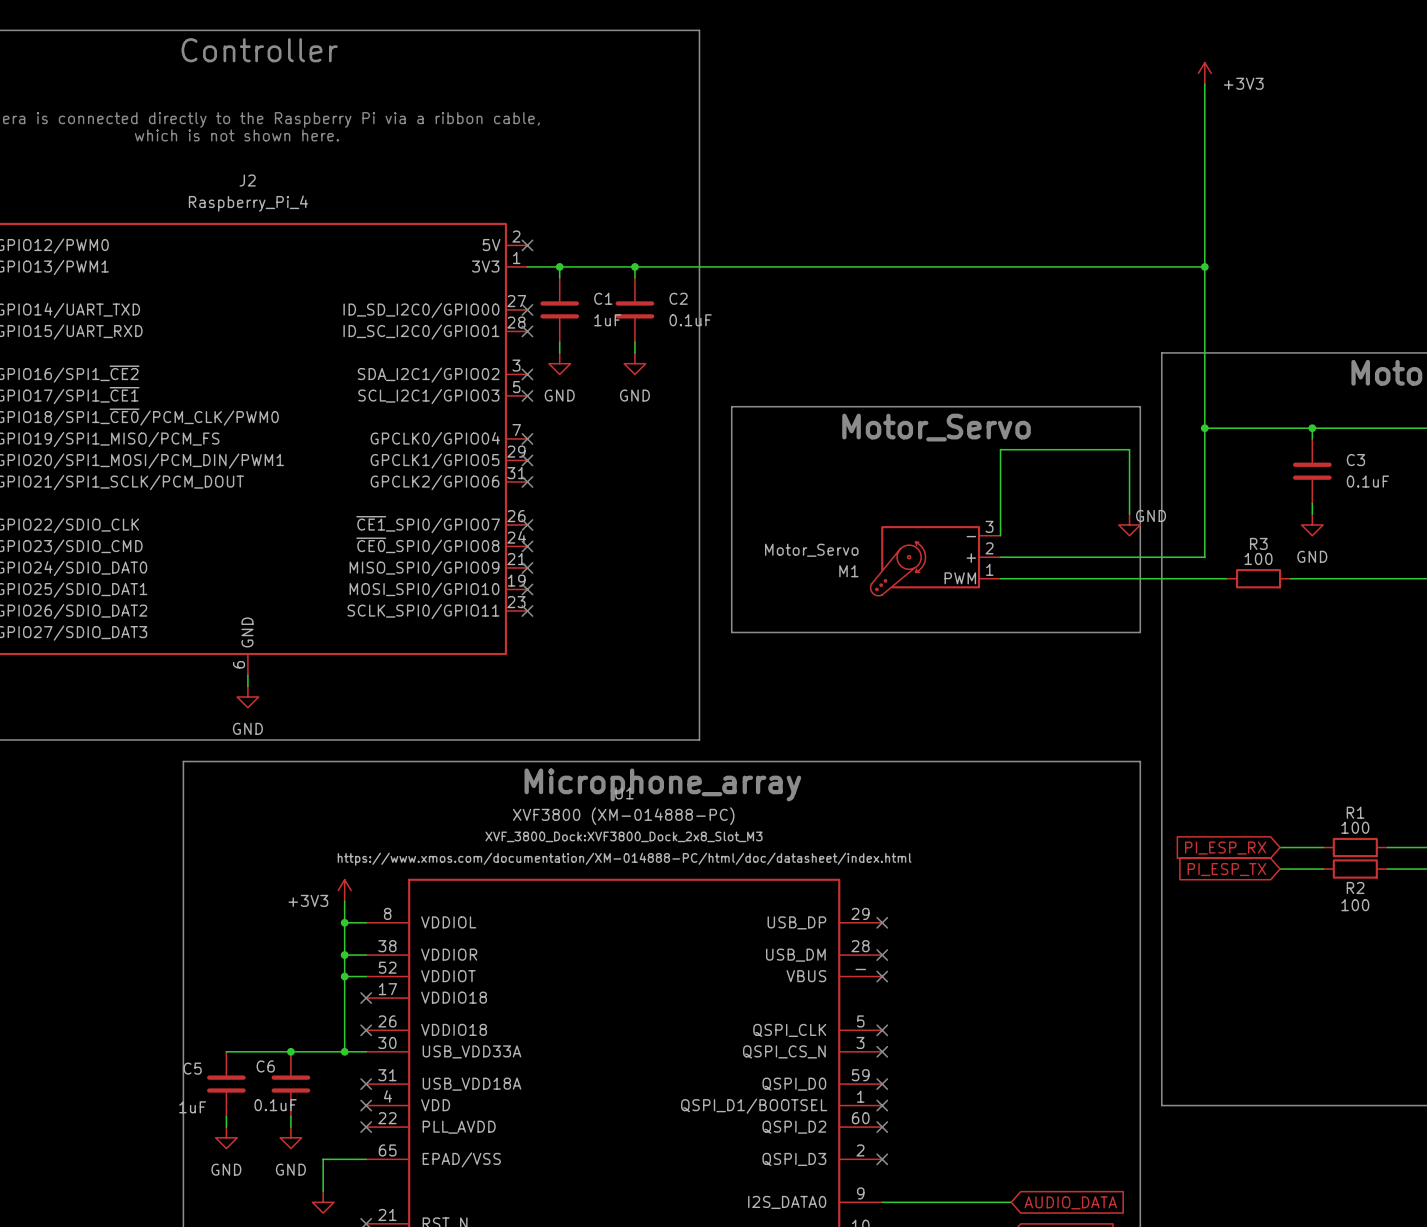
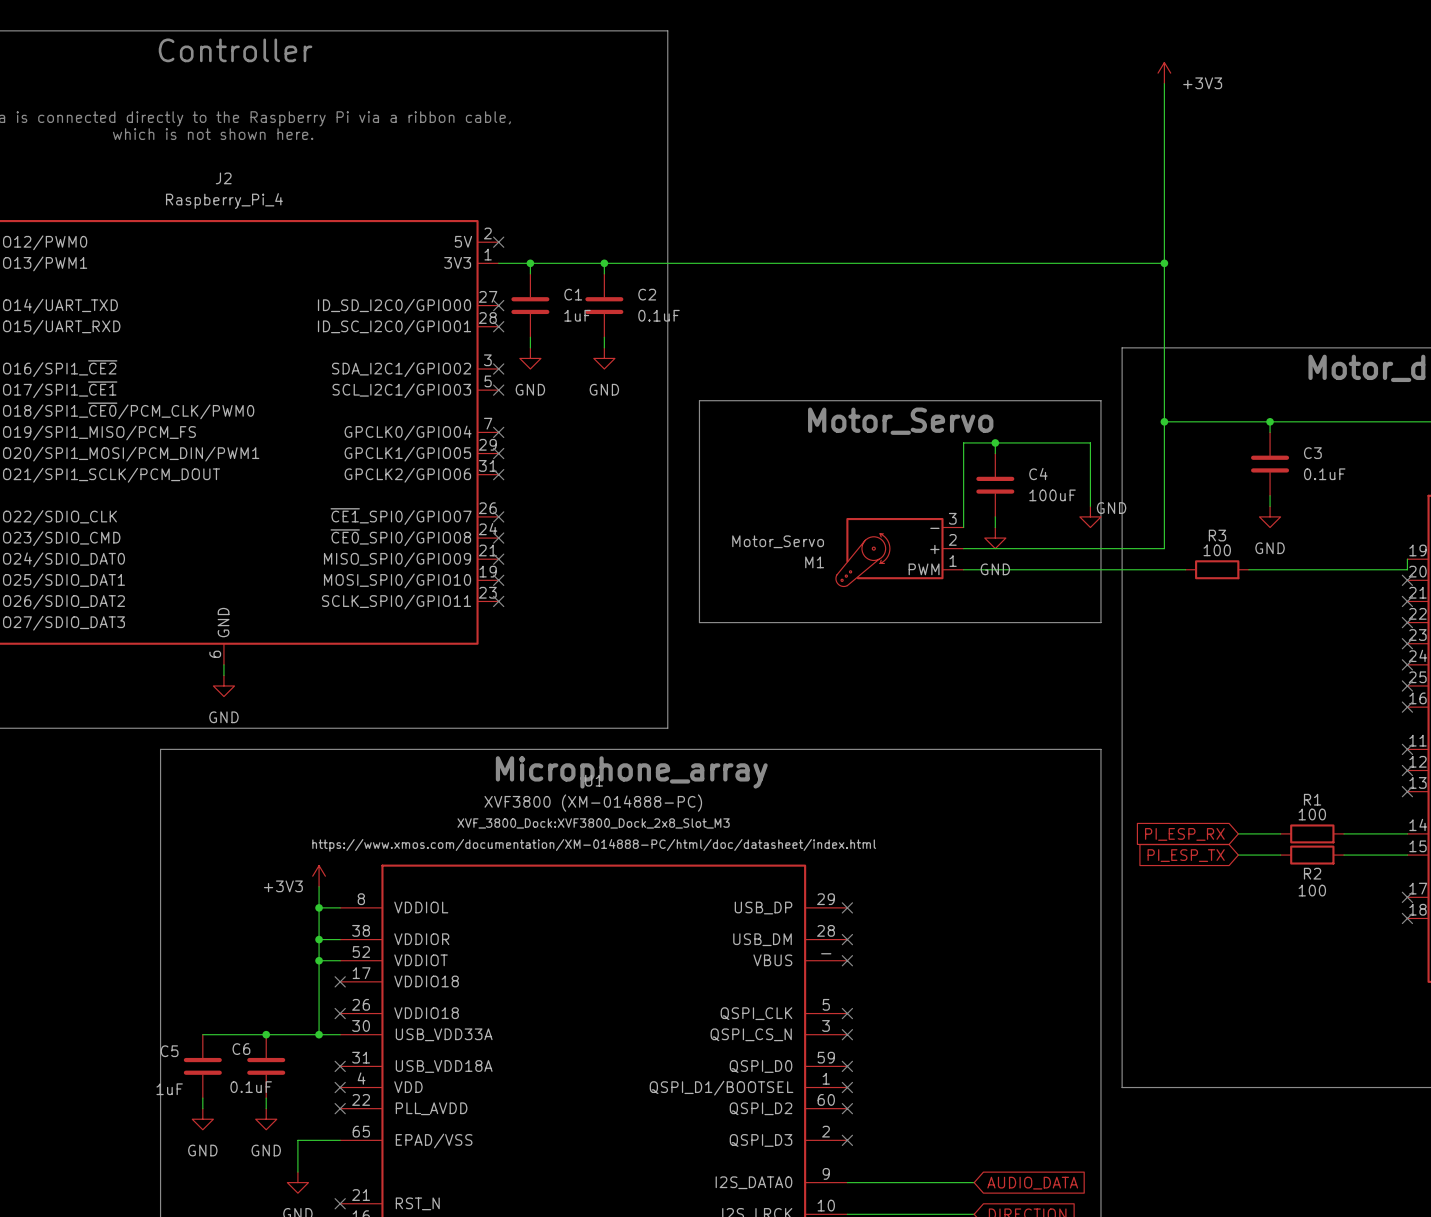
wire: none -> (995, 442) (995, 453)
junction: none -> (995, 442)
C4: none -> 100uF (995, 485)
wire: none -> (995, 516) (995, 527)
power symbol: none -> GND (995, 538)

